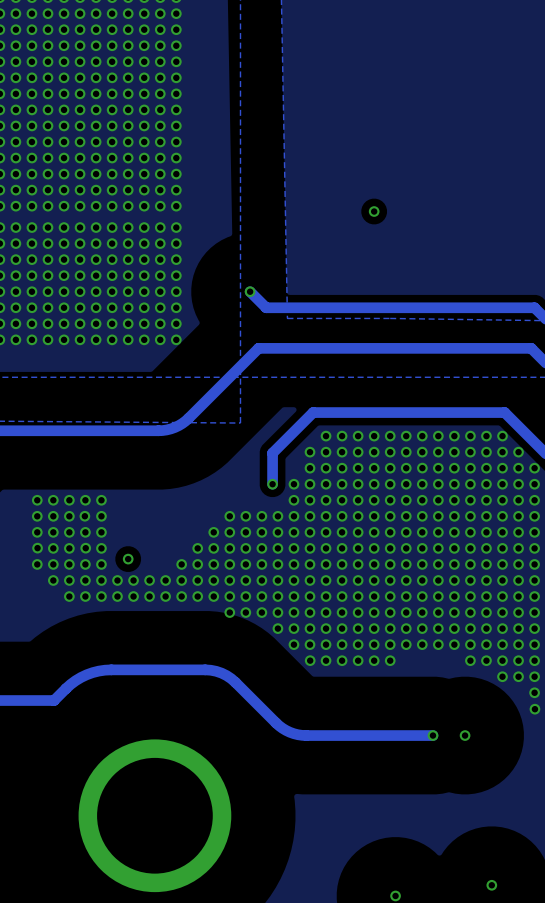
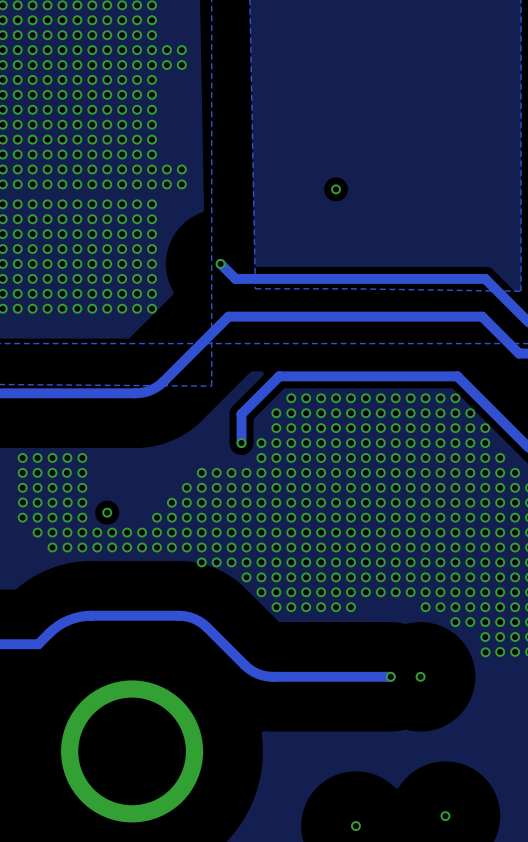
via: none -> (166, 50)
via: none -> (181, 50)
via: none -> (166, 65)
via: none -> (181, 65)
via: none -> (166, 169)
via: none -> (181, 169)
via: none -> (166, 184)
via: none -> (181, 184)

